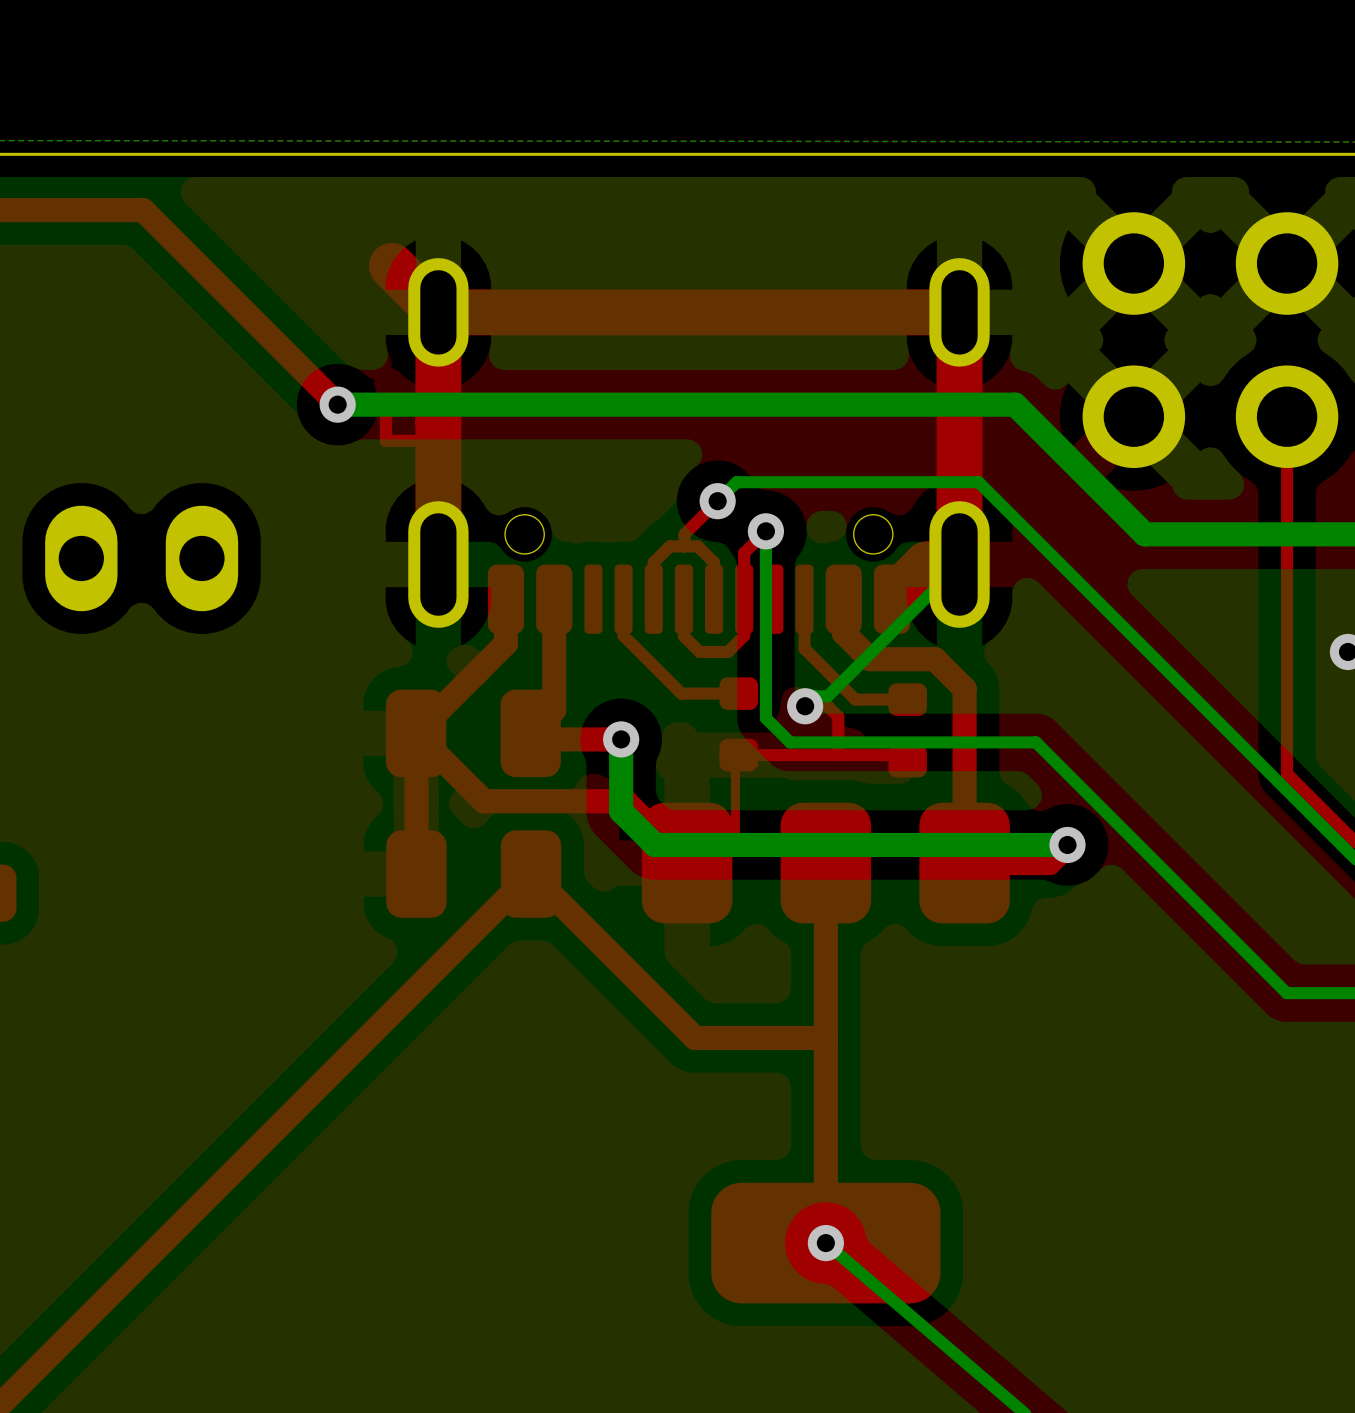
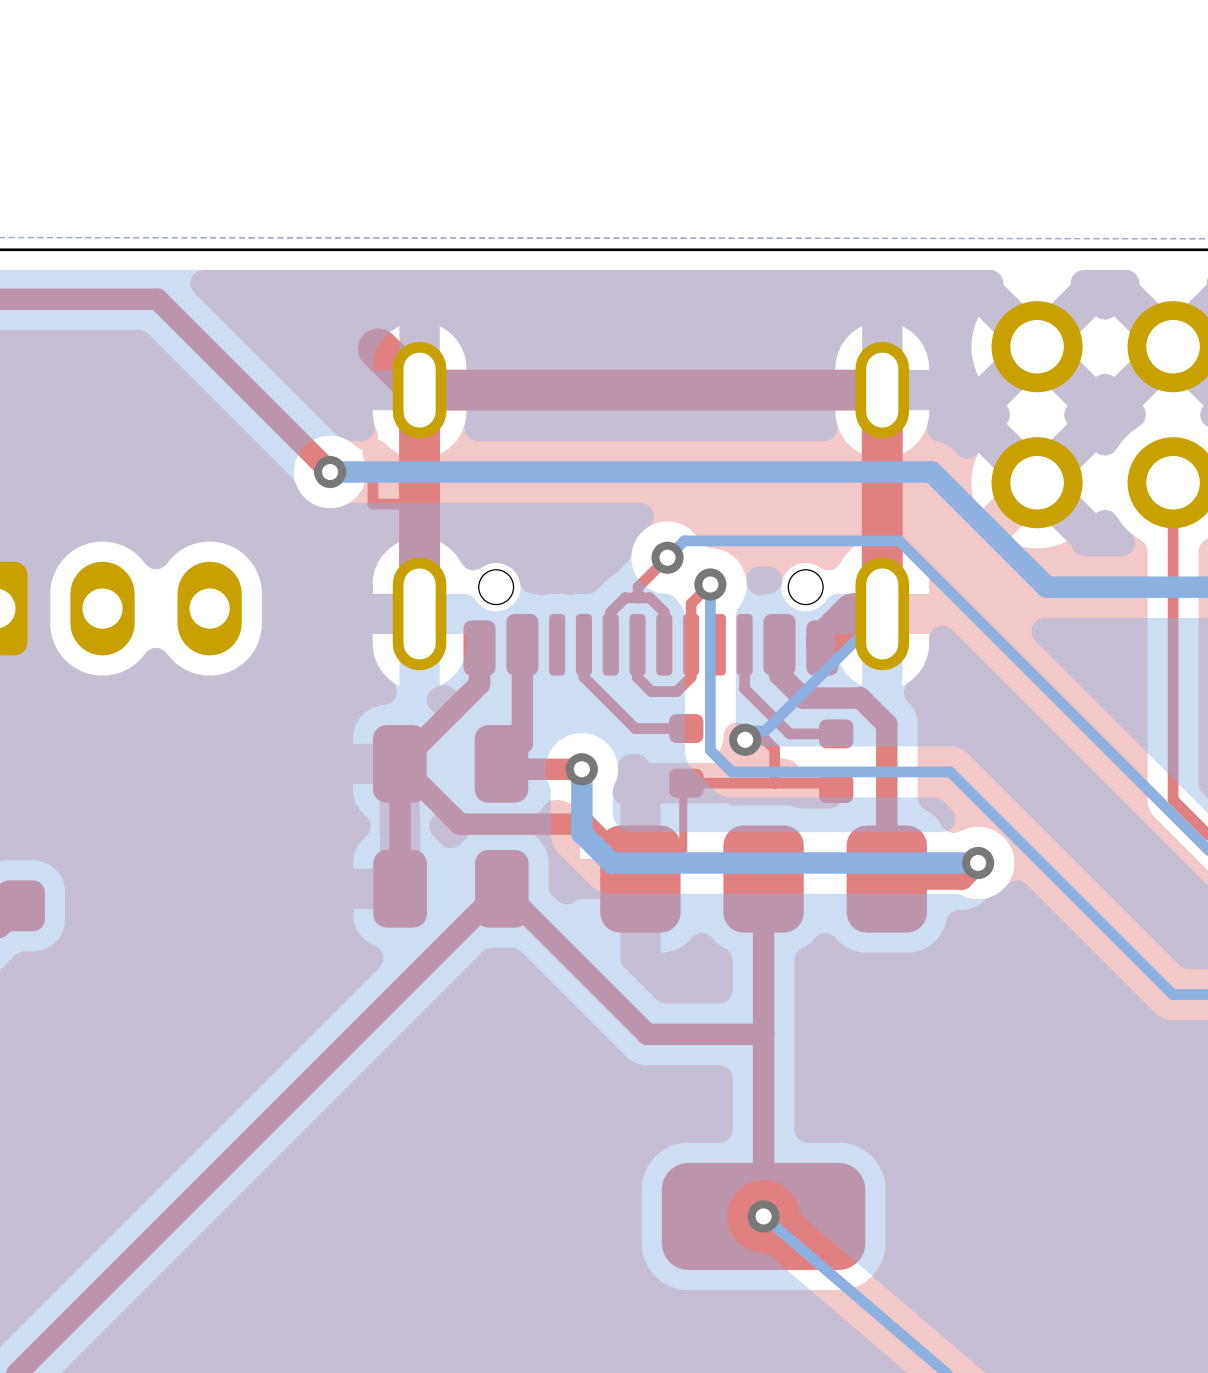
part footprint: [408, 258, 990, 634] -> [392, 341, 910, 676]

